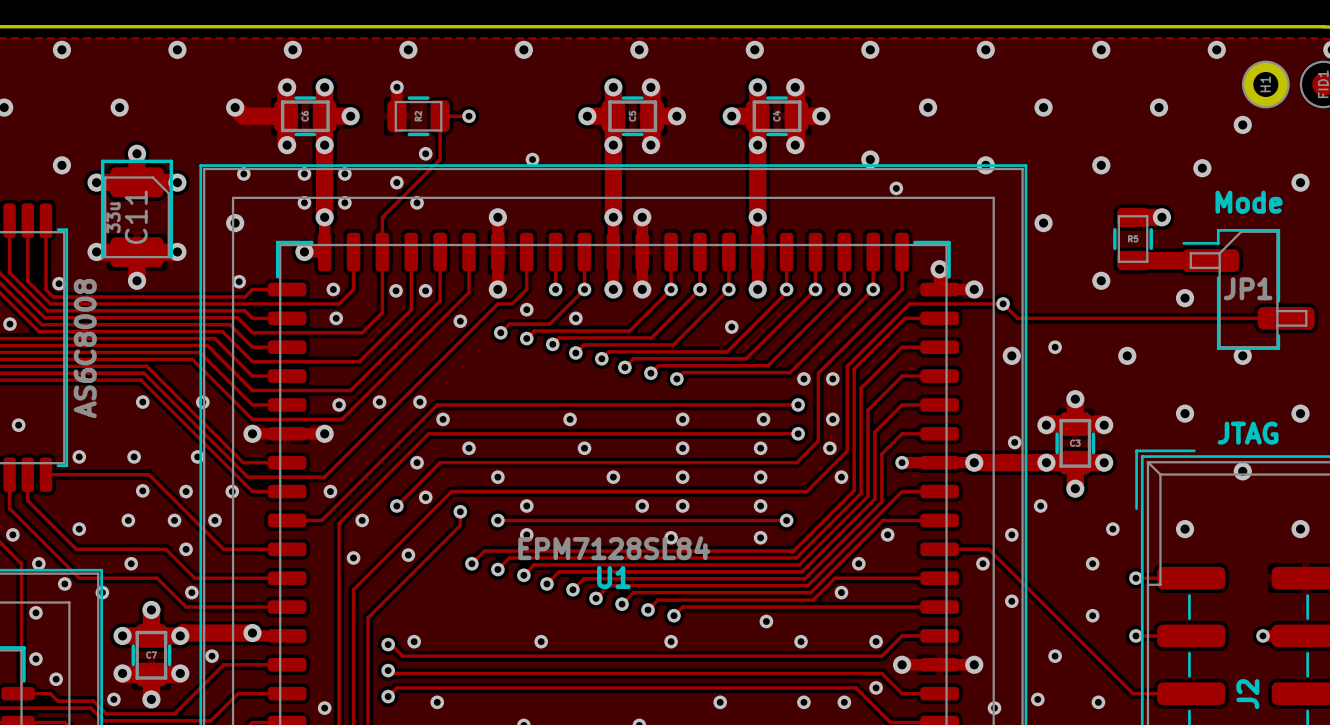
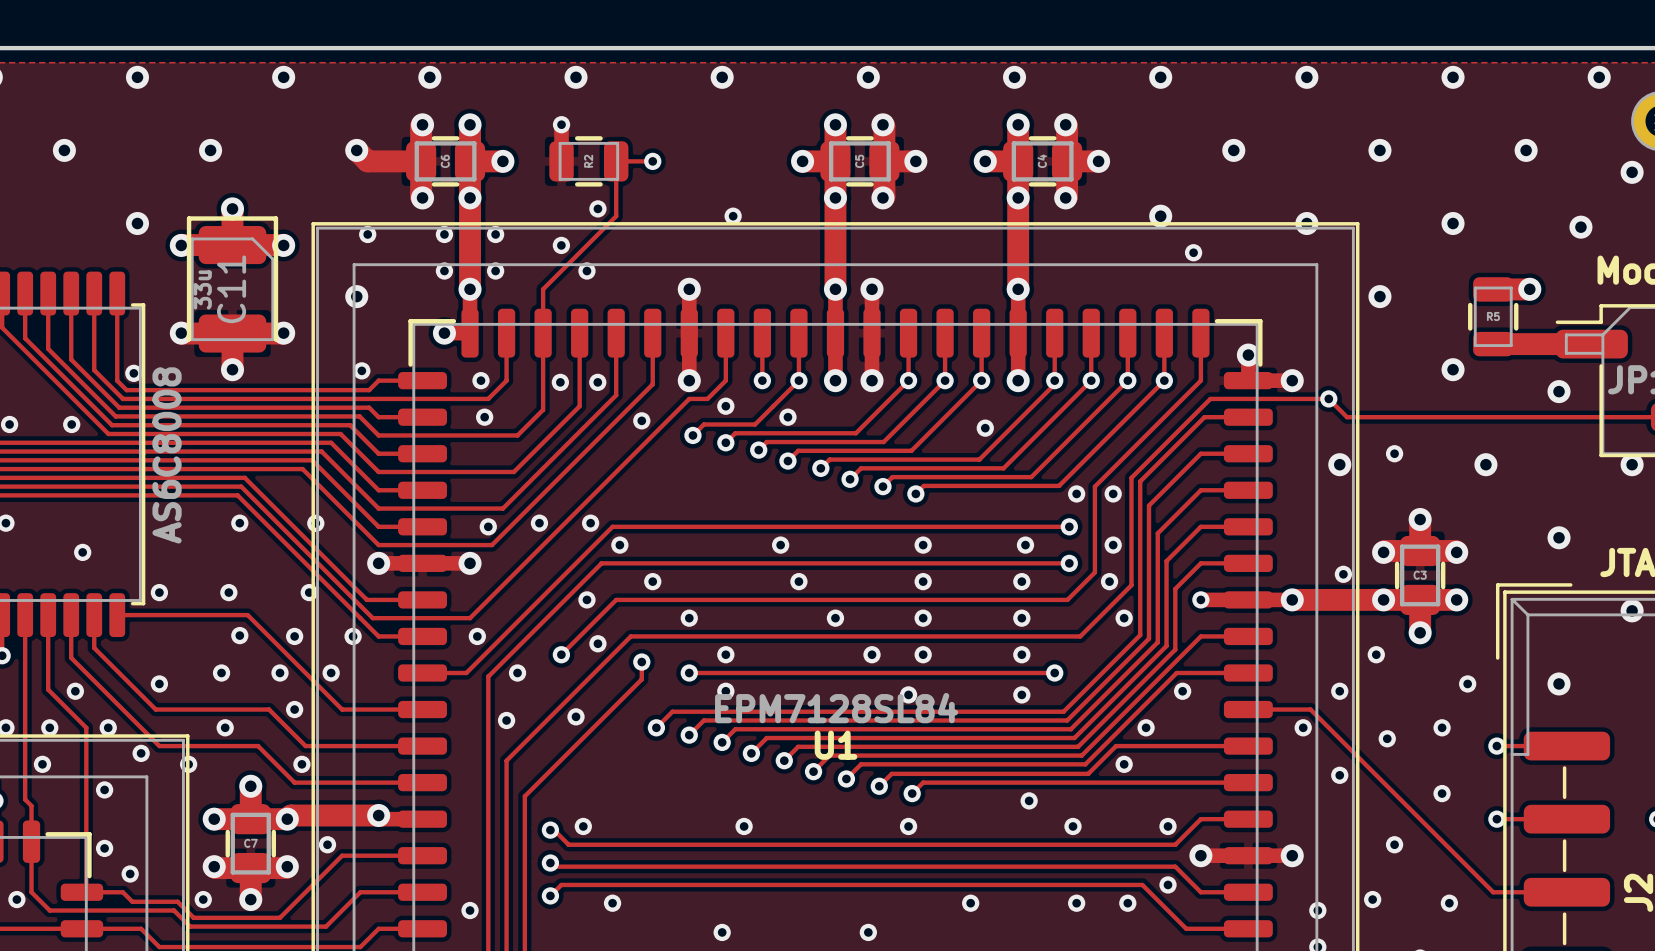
via: none -> (1387, 738)

